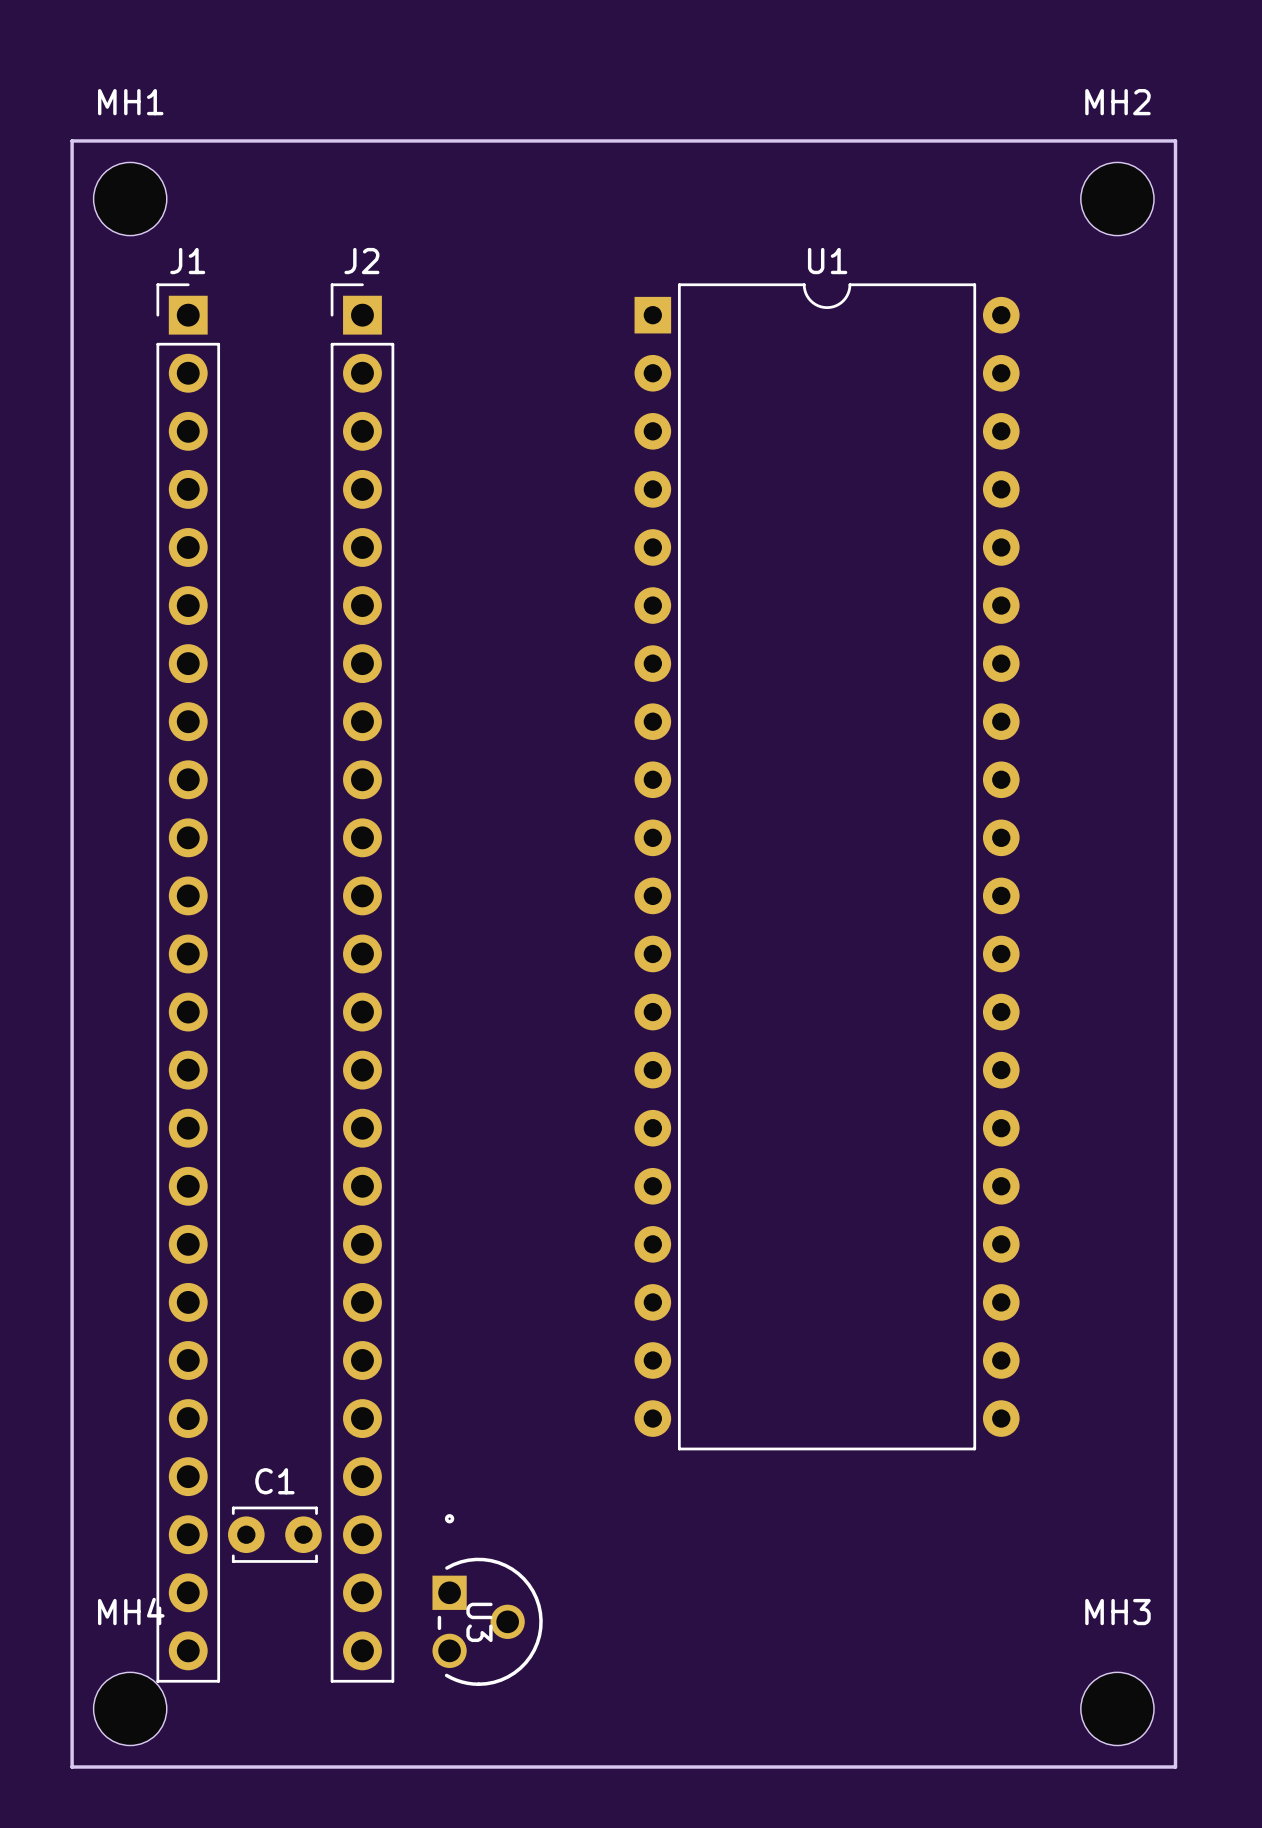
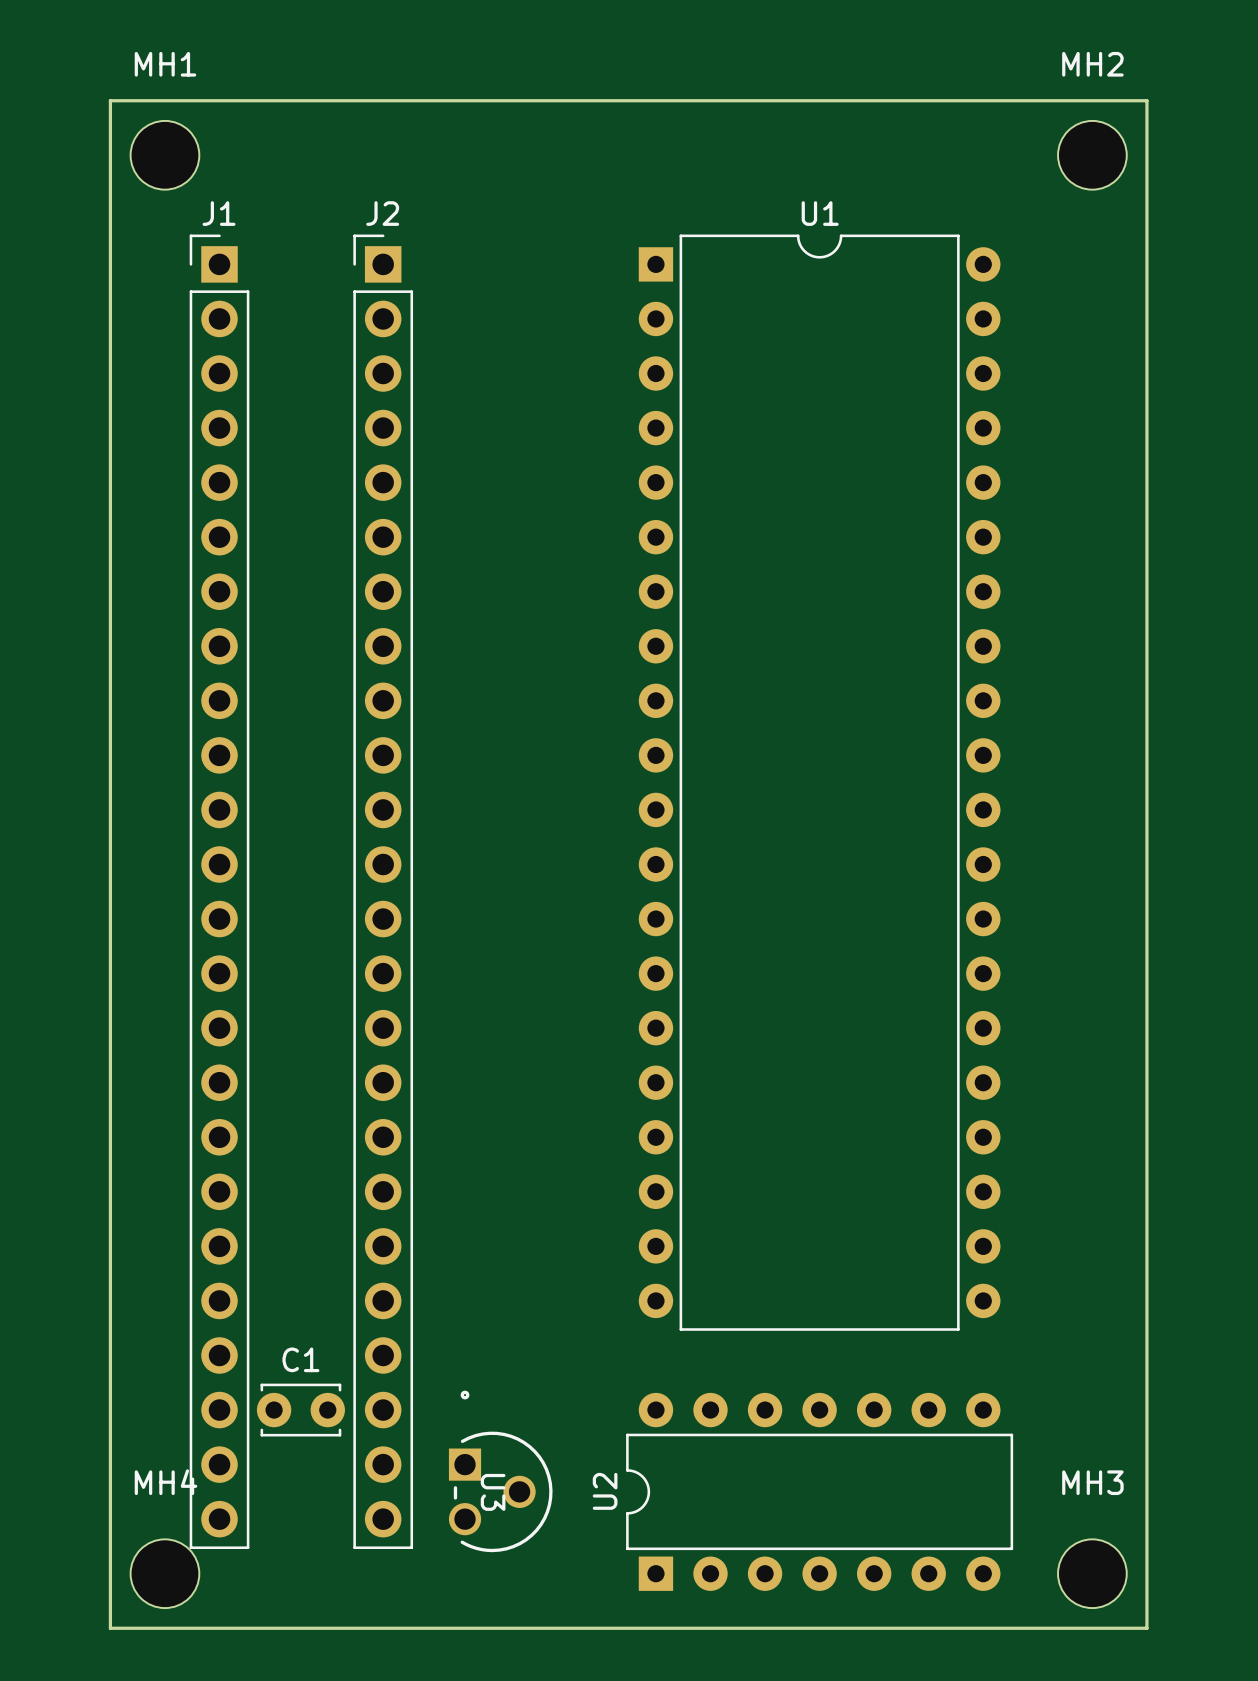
U2: none -> (819, 1491)

